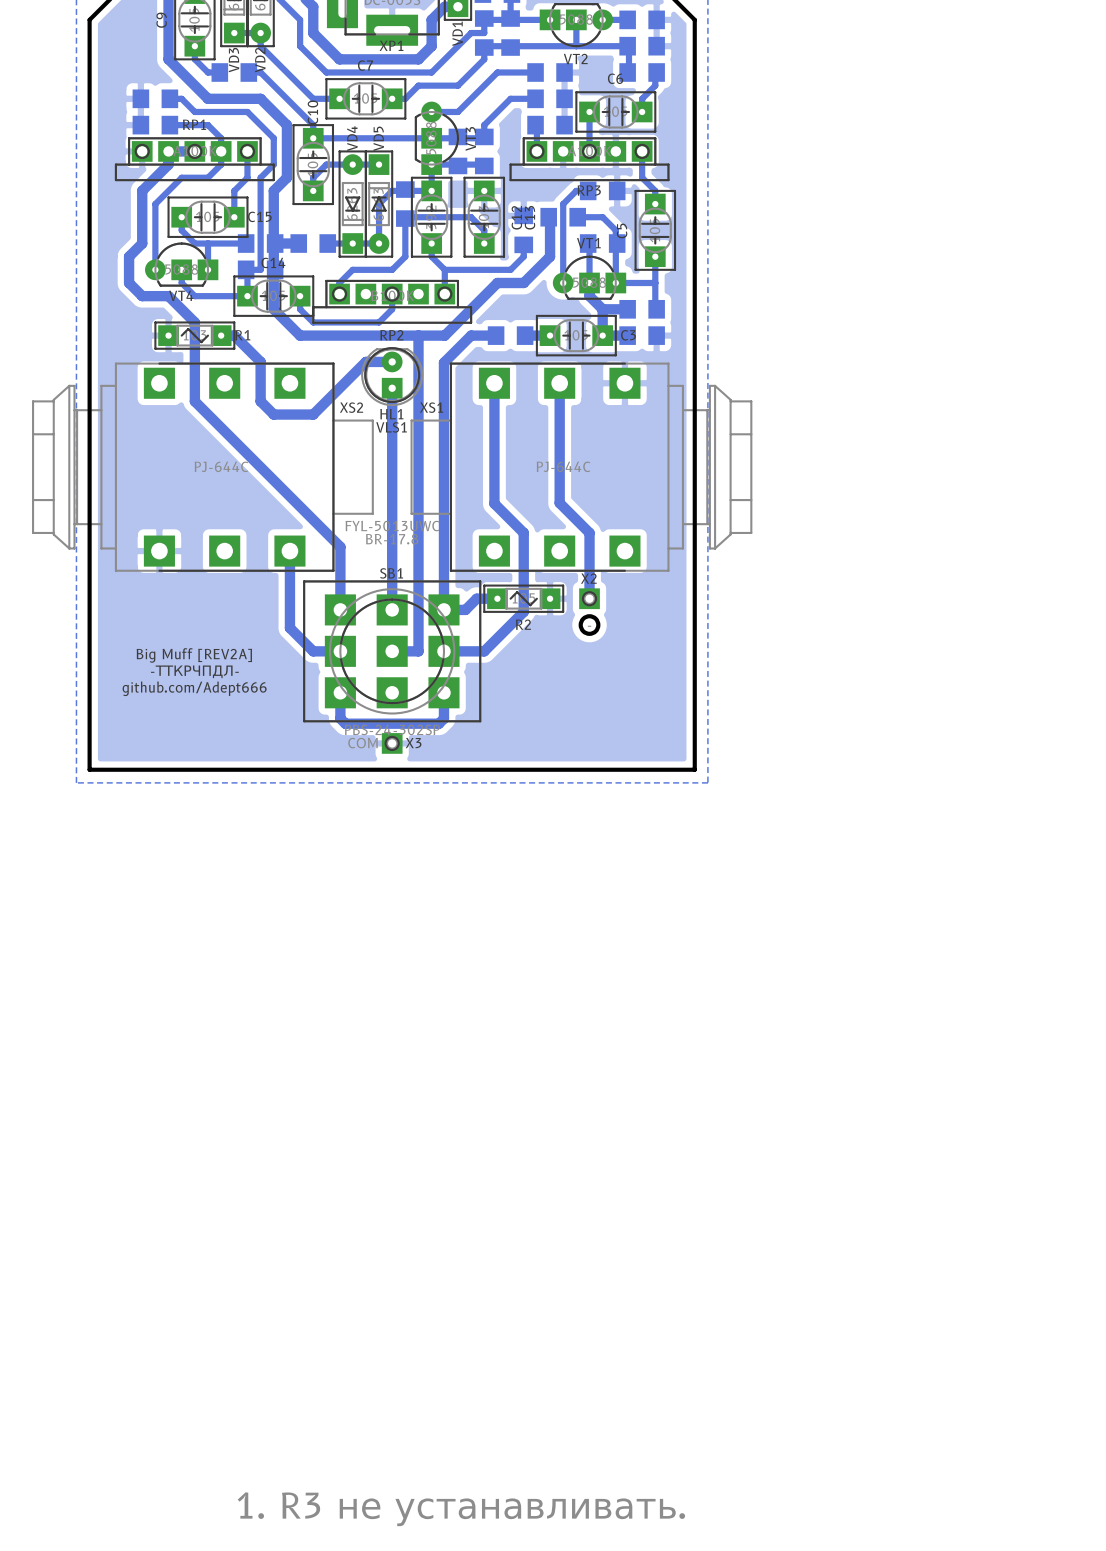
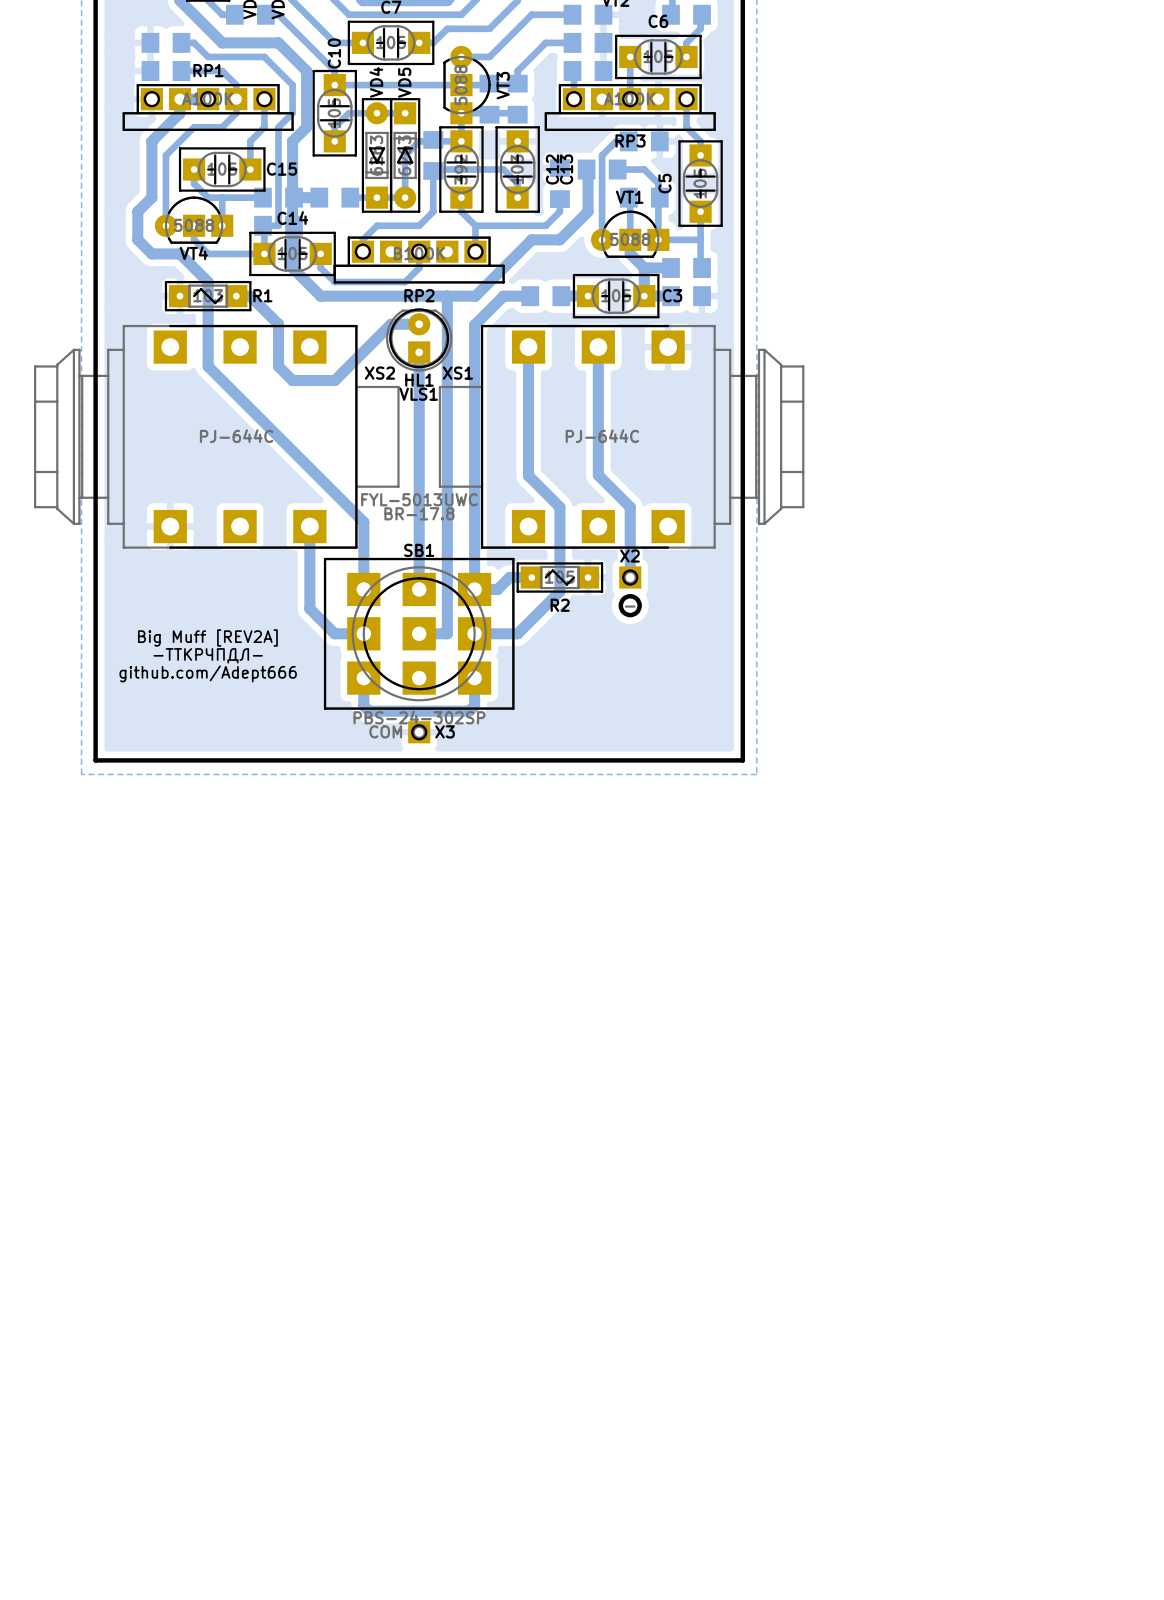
text: 1. R3 не устанавливать. (461, 1509) -> none

